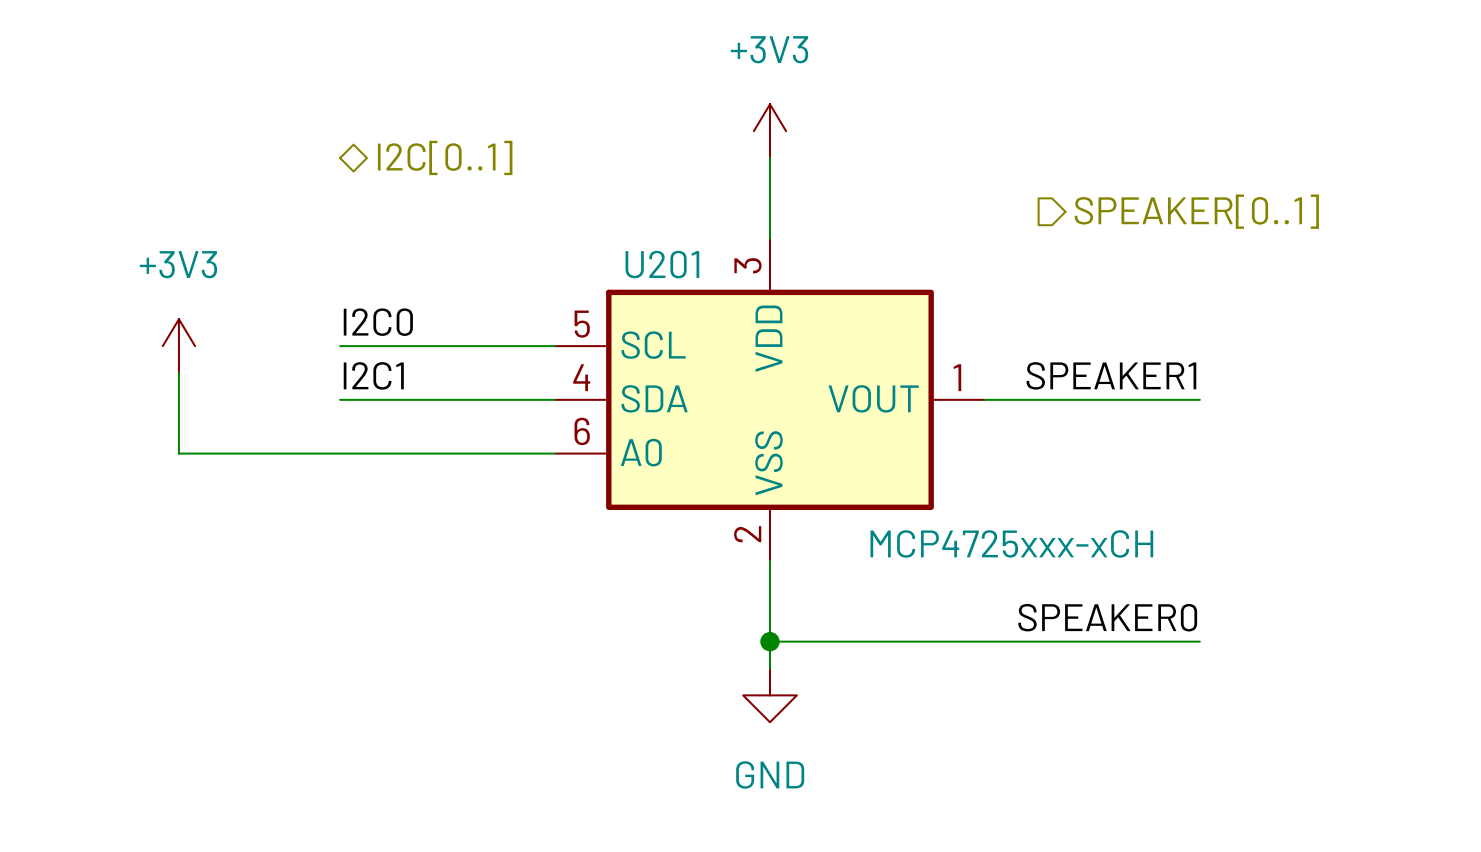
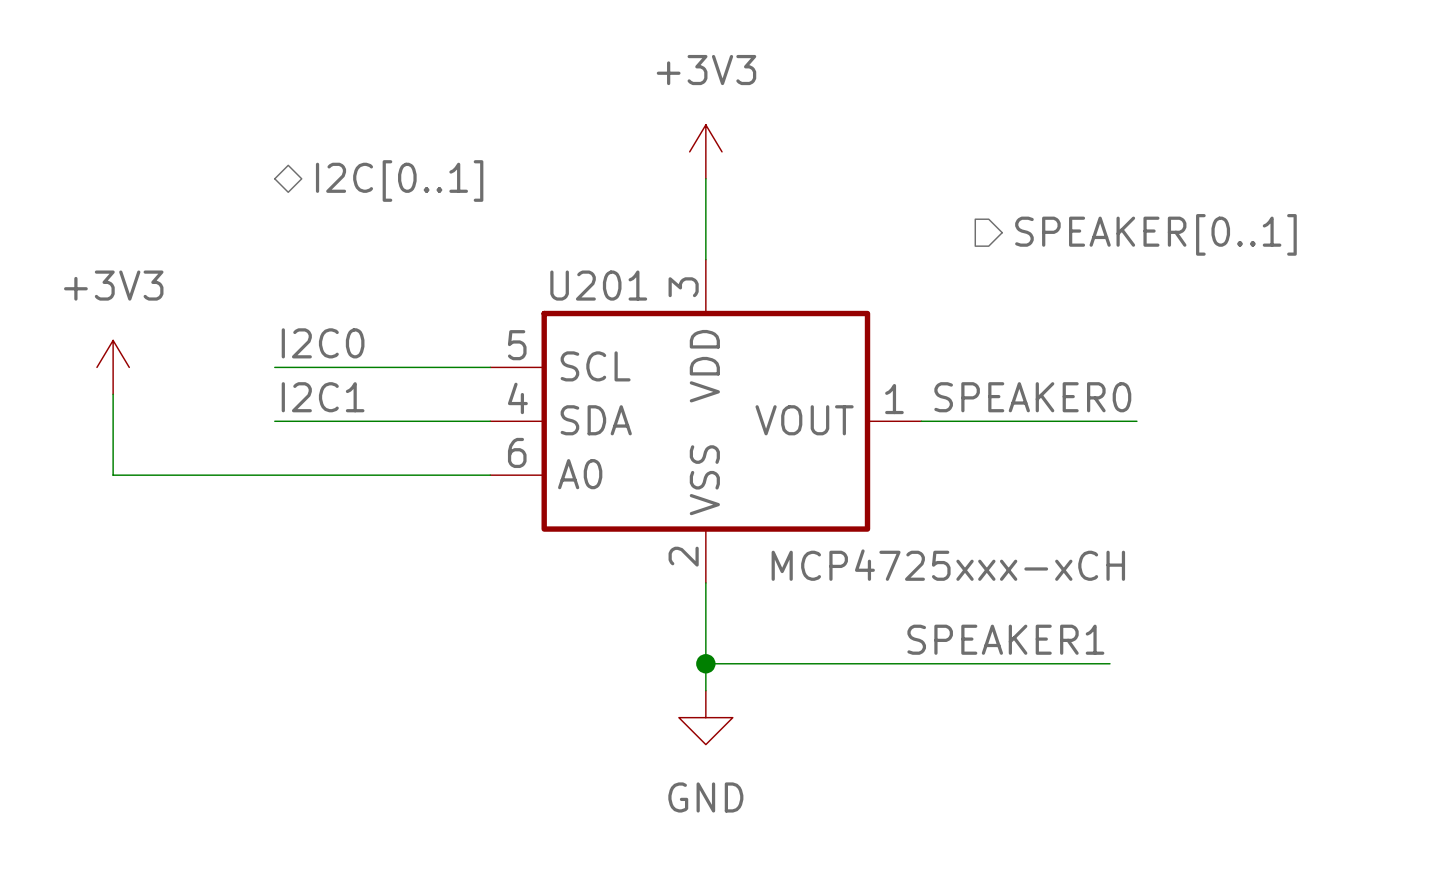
label: SPEAKER1 (1111, 375) -> SPEAKER0 (1032, 397)
label: SPEAKER0 (1107, 617) -> SPEAKER1 (1005, 639)
wire: (1172, 641) (1199, 641) -> none

